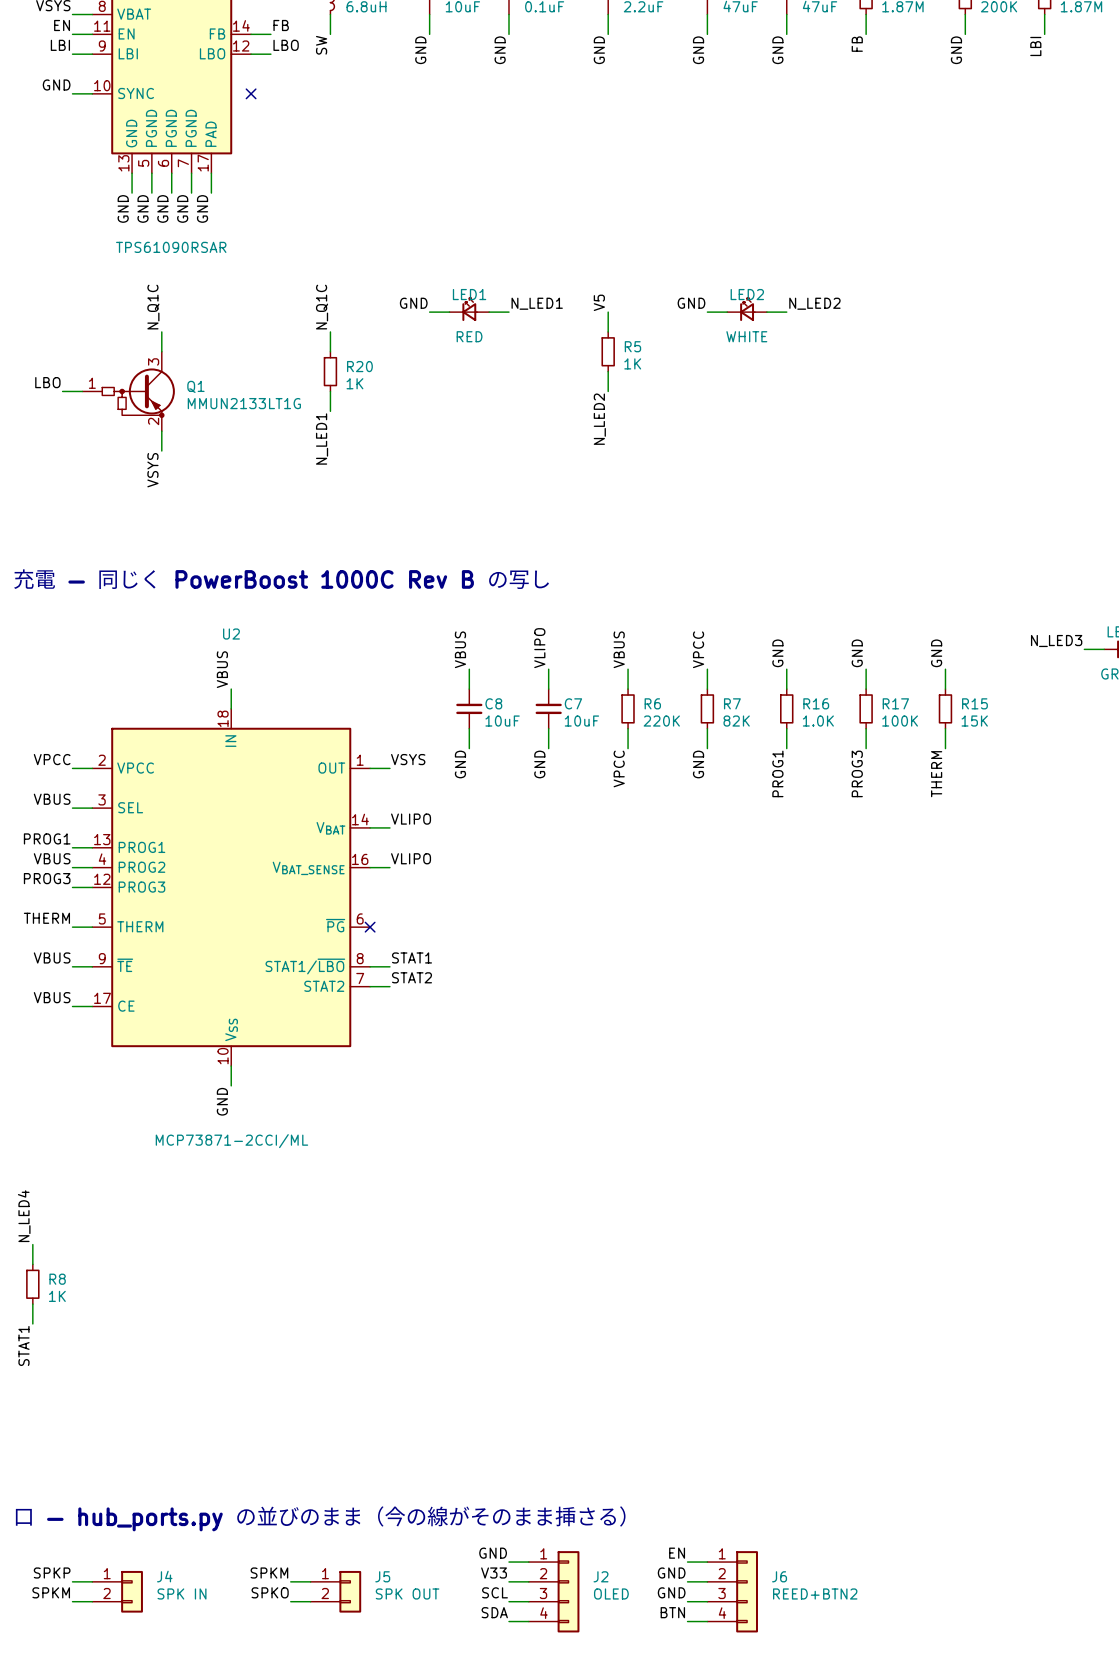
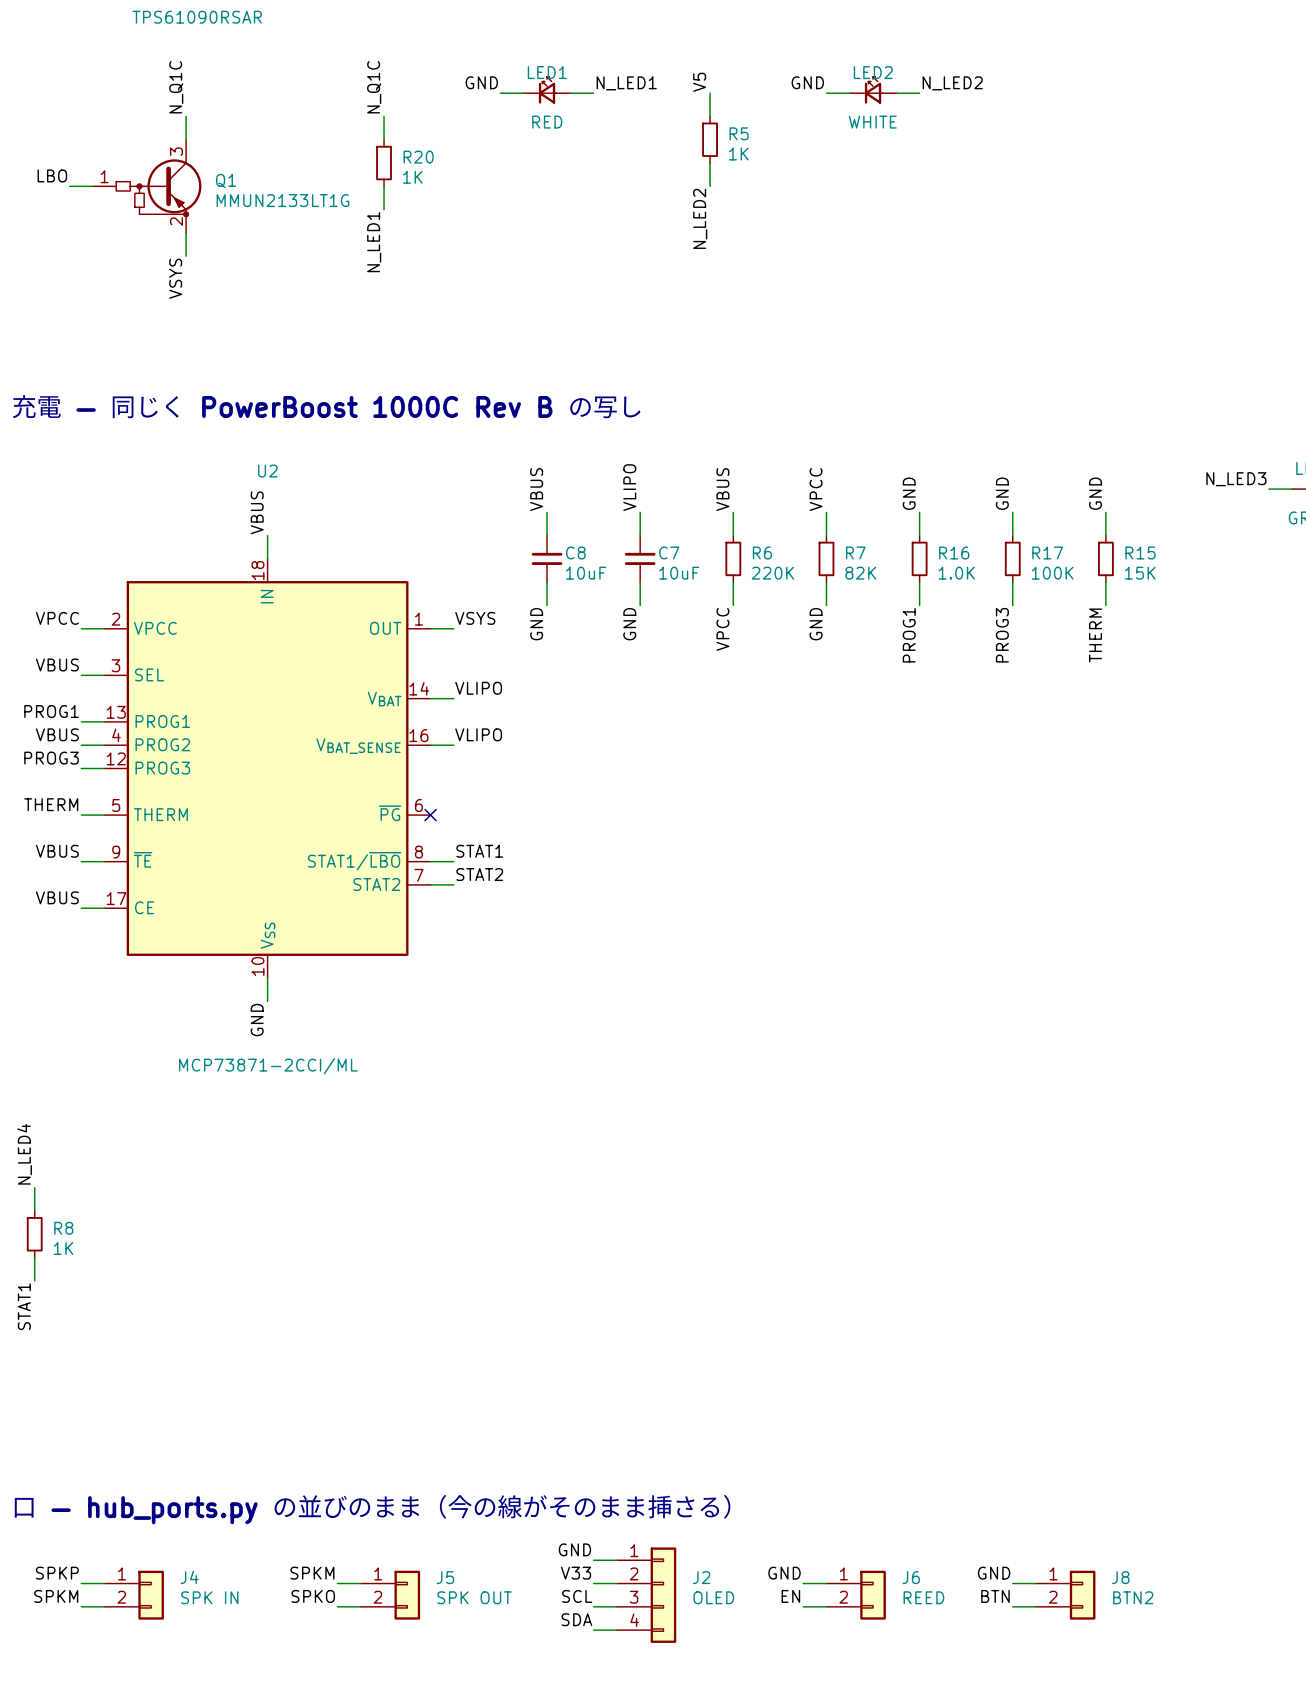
J6 symbol: [707, 1551, 758, 1633] -> [826, 1570, 886, 1620]
label: EN (677, 1553) -> none
wire: (687, 1562) (707, 1562) -> (1012, 1583) (1036, 1583)
label: none -> GND (994, 1573)
J8: none -> BTN2 (1065, 1595)
label: GND (671, 1592) -> EN (790, 1596)
J6 value: REED+BTN2 (815, 1593) -> REED (923, 1597)
label position: BTN (672, 1612) -> BTN (995, 1596)
wire: (687, 1621) (707, 1621) -> (1012, 1606) (1036, 1606)

